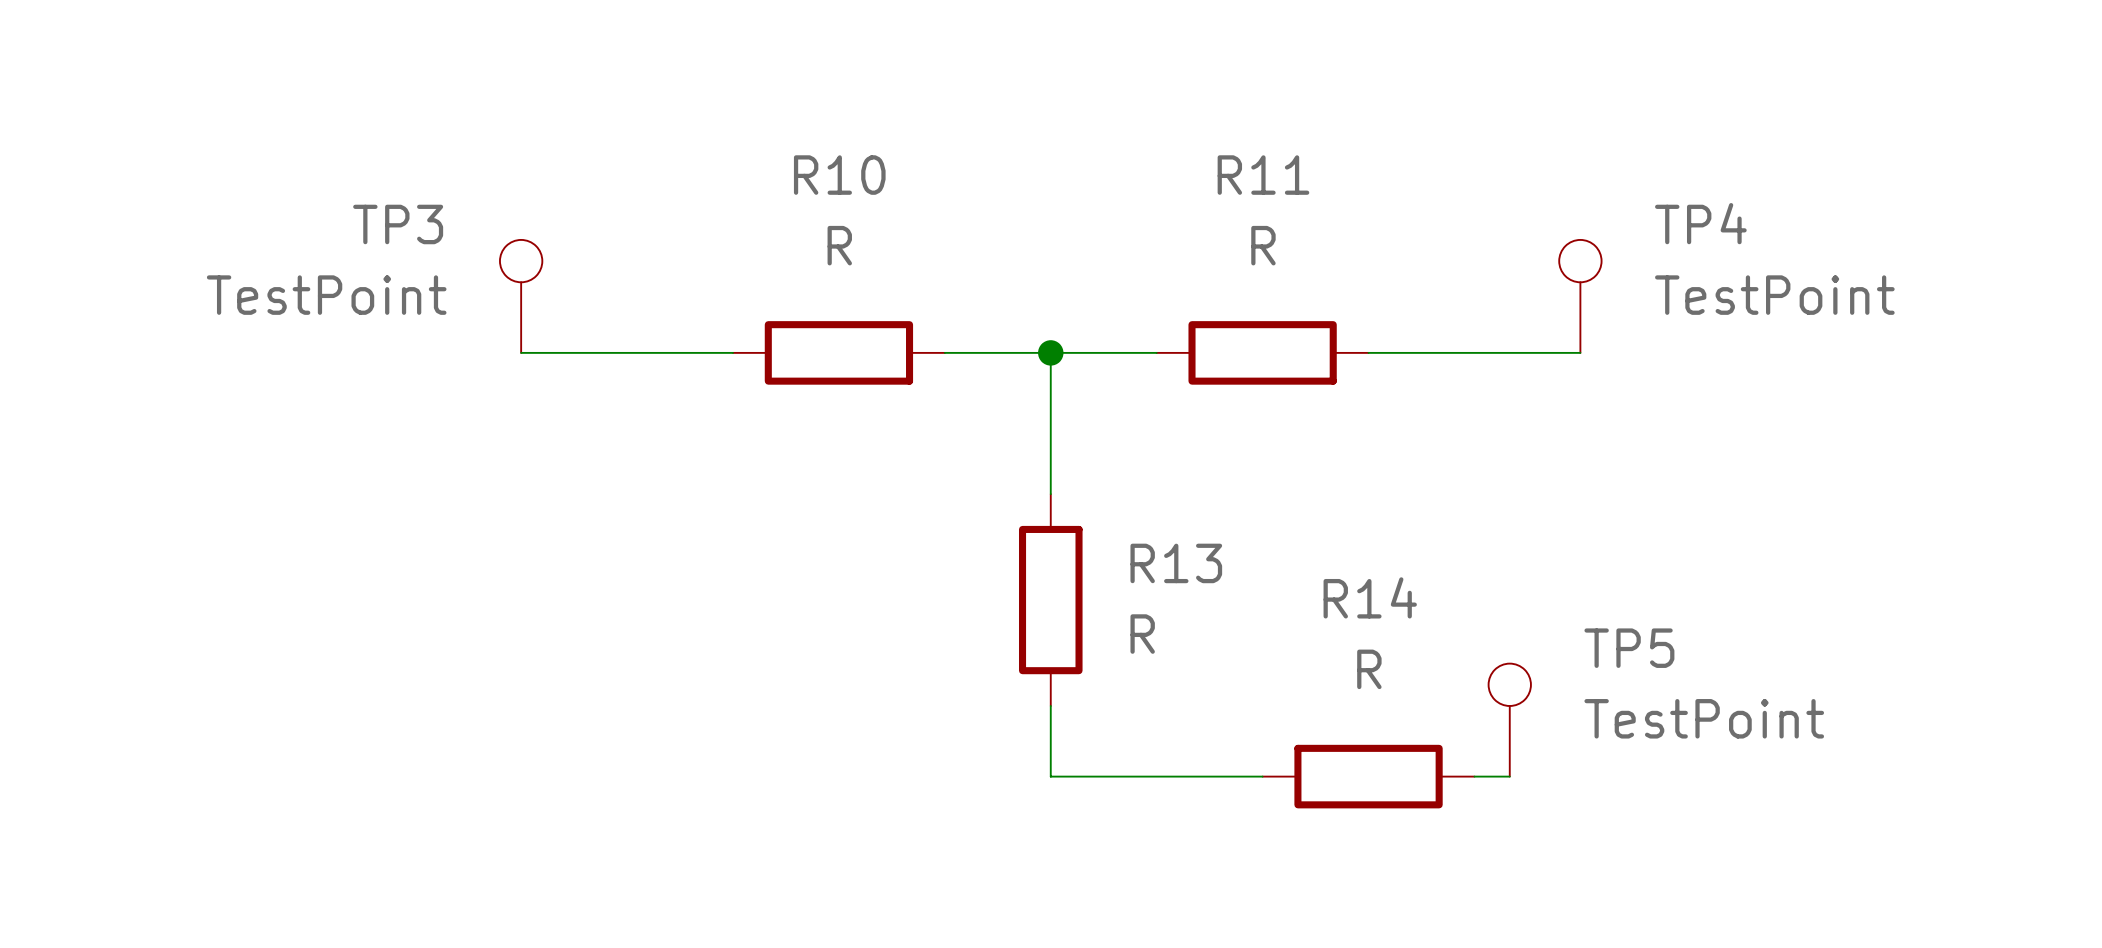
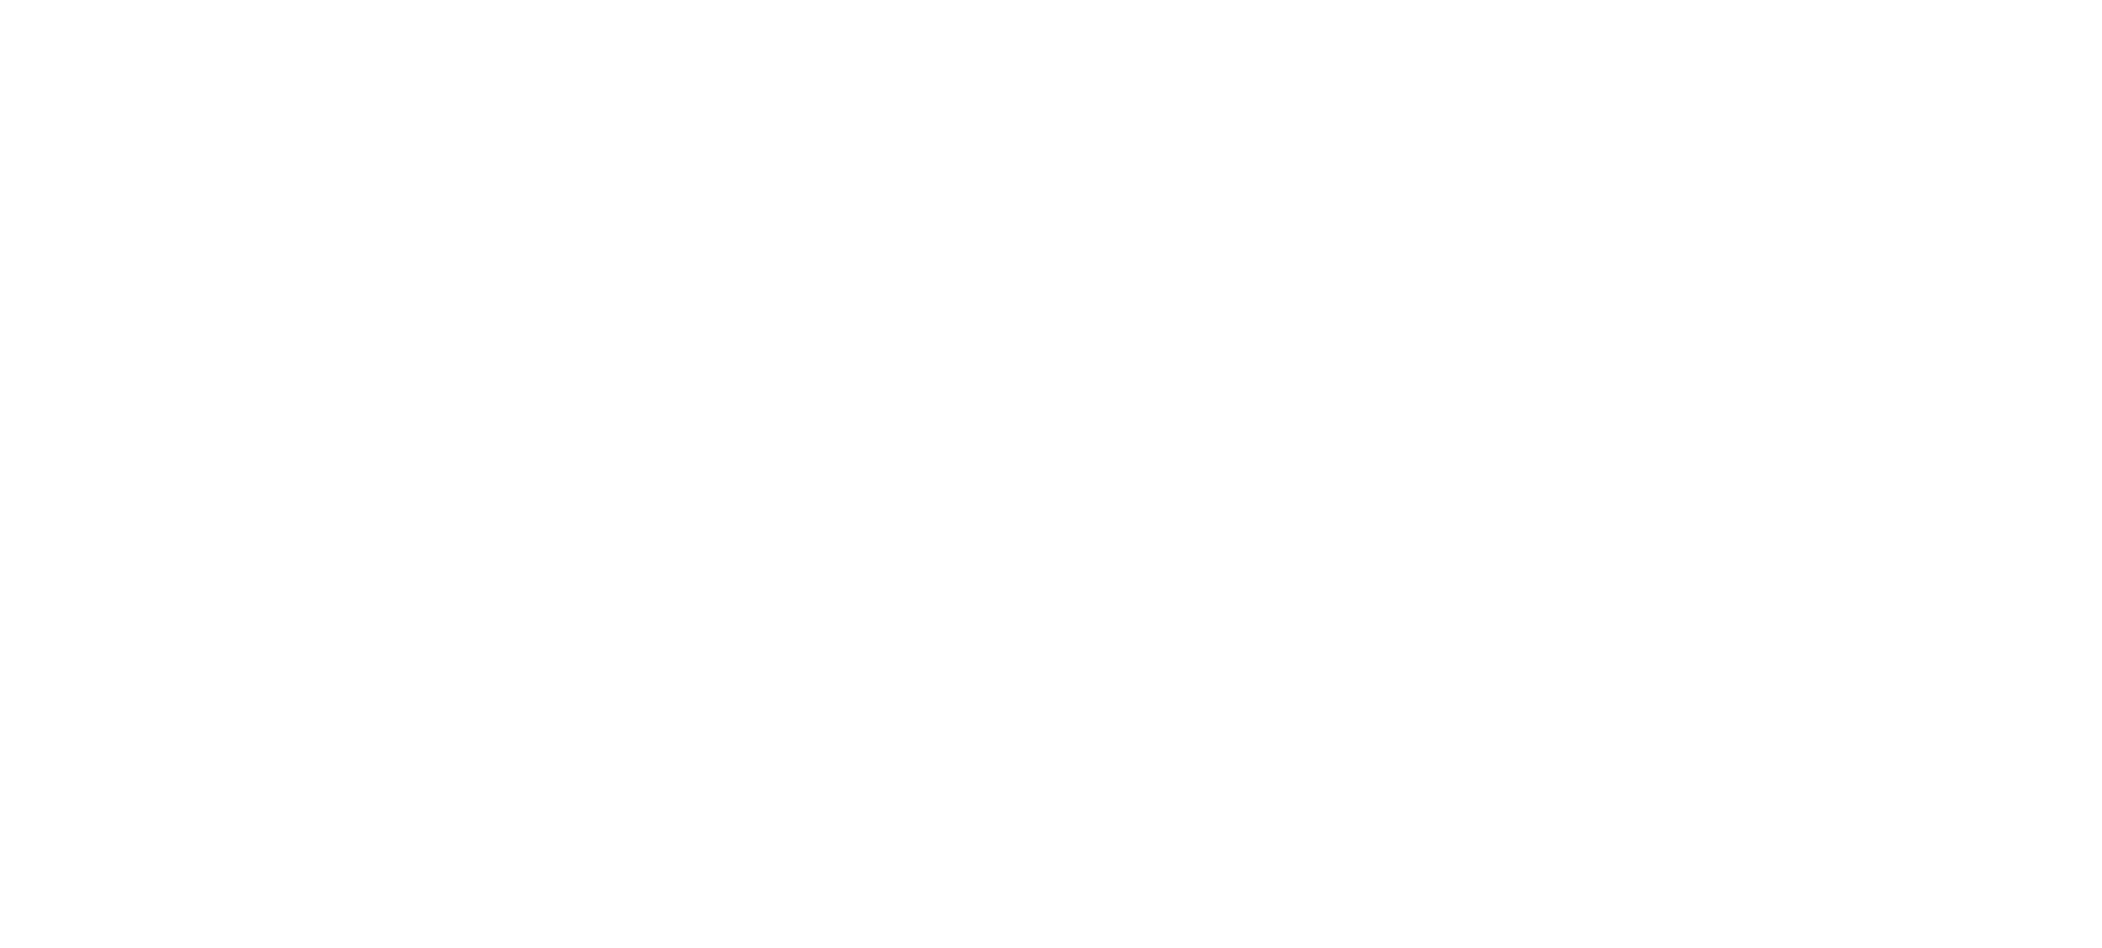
TP3: TestPoint (521, 296) -> none
TP4: TestPoint (1580, 296) -> none
wire: (521, 352) (733, 352) -> none
R10: R (838, 352) -> none
wire: (944, 352) (1156, 352) -> none
wire: (1050, 352) (1050, 494) -> none
junction: (1050, 352) -> none
R11: R (1262, 352) -> none
wire: (1368, 352) (1580, 352) -> none
R13: R (1050, 600) -> none
wire: (1050, 705) (1050, 776) (1262, 776) -> none
TP5: TestPoint (1509, 720) -> none
R14: R (1368, 776) -> none
wire: (1474, 776) (1509, 776) -> none

